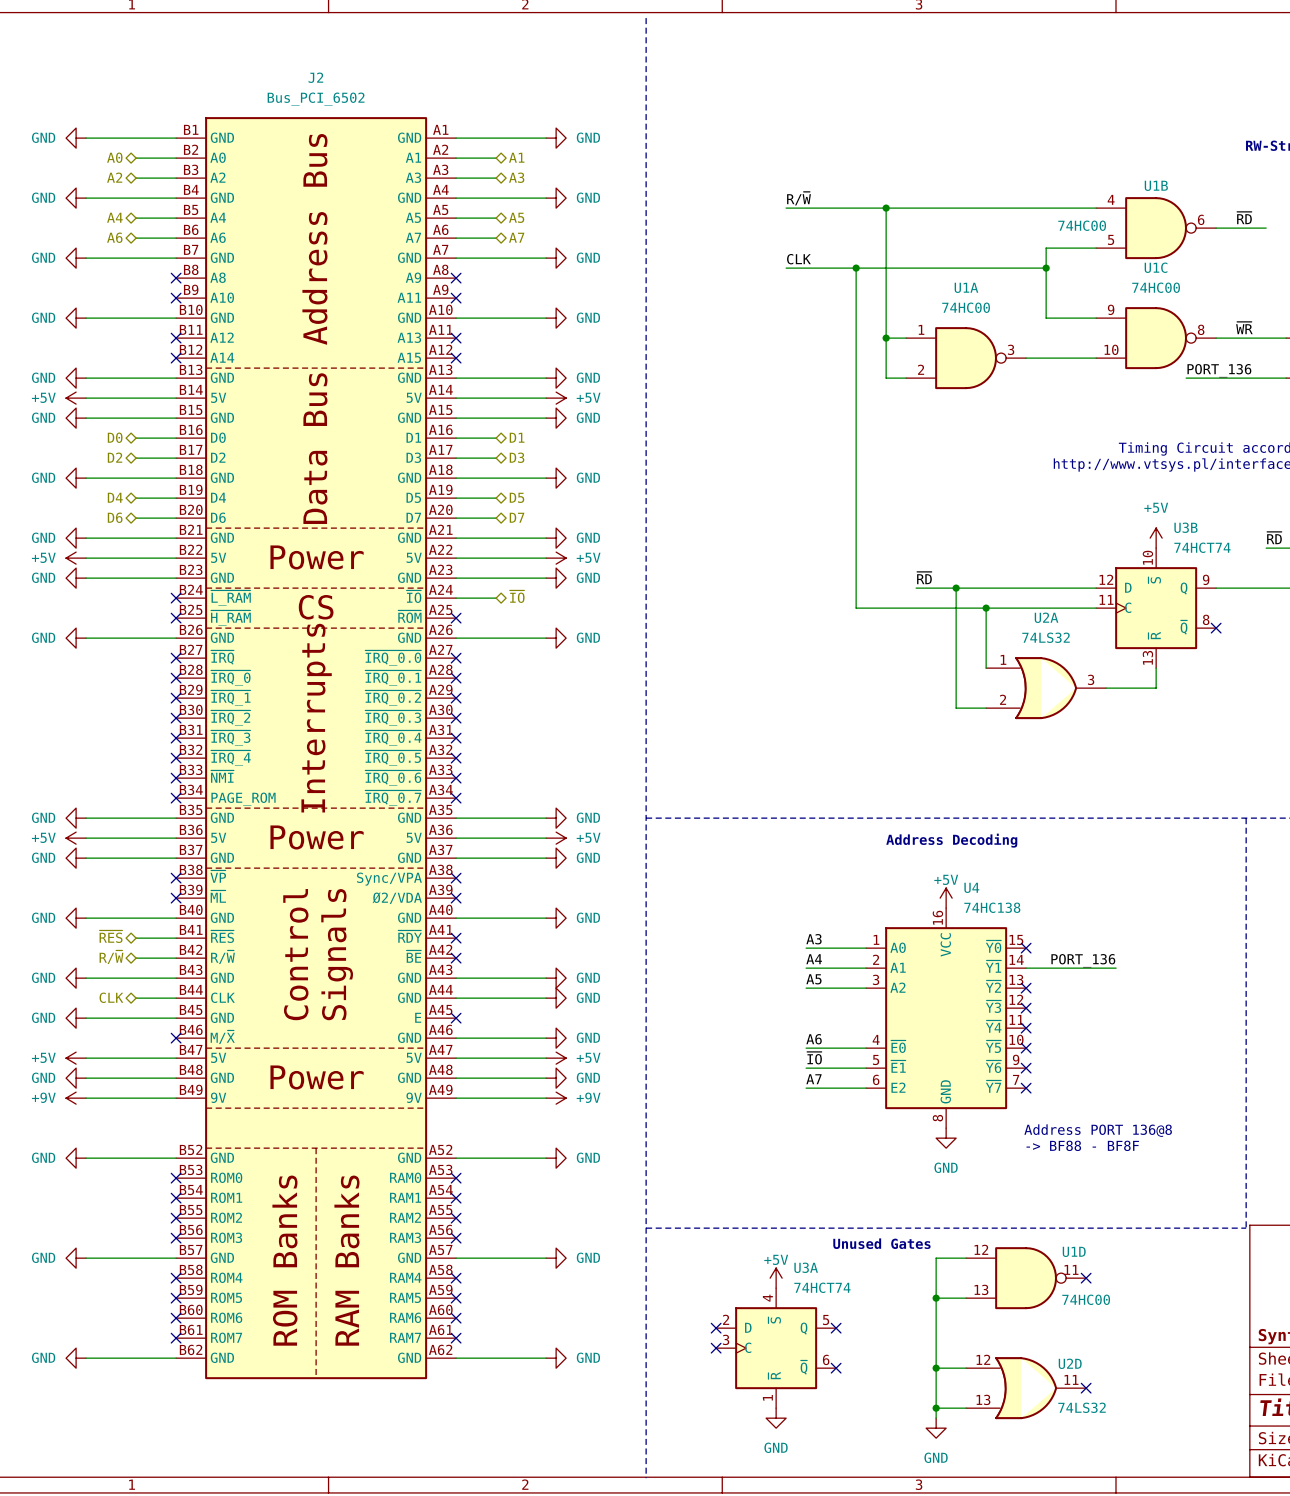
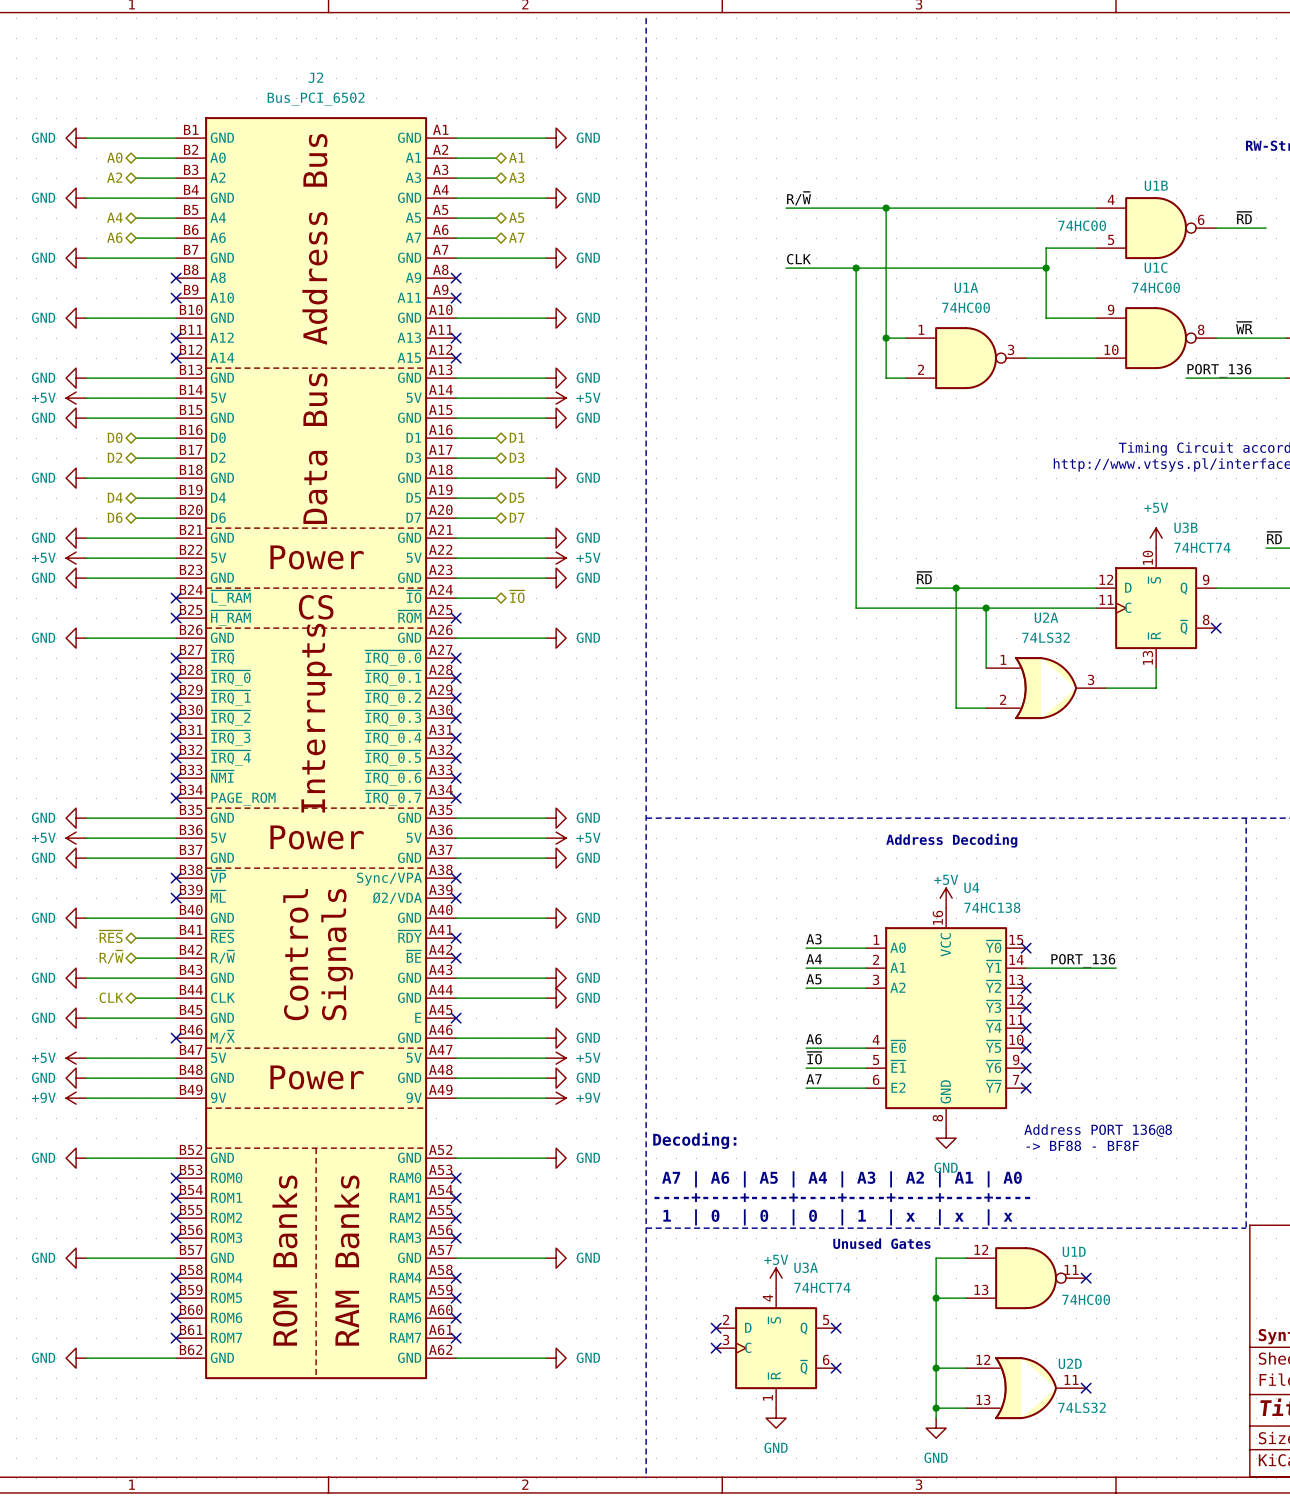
text: none -> Decoding: (694, 1140)
text: none -> A7 | A6 | A5 | A4 | A3 | A2 | A1 | A0 (841, 1179)
text: none -> ----+----+----+----+----+----+----+---- (842, 1197)
text: none -> 1 | 0 | 0 | 0 | 1 | x | x | x (837, 1217)

